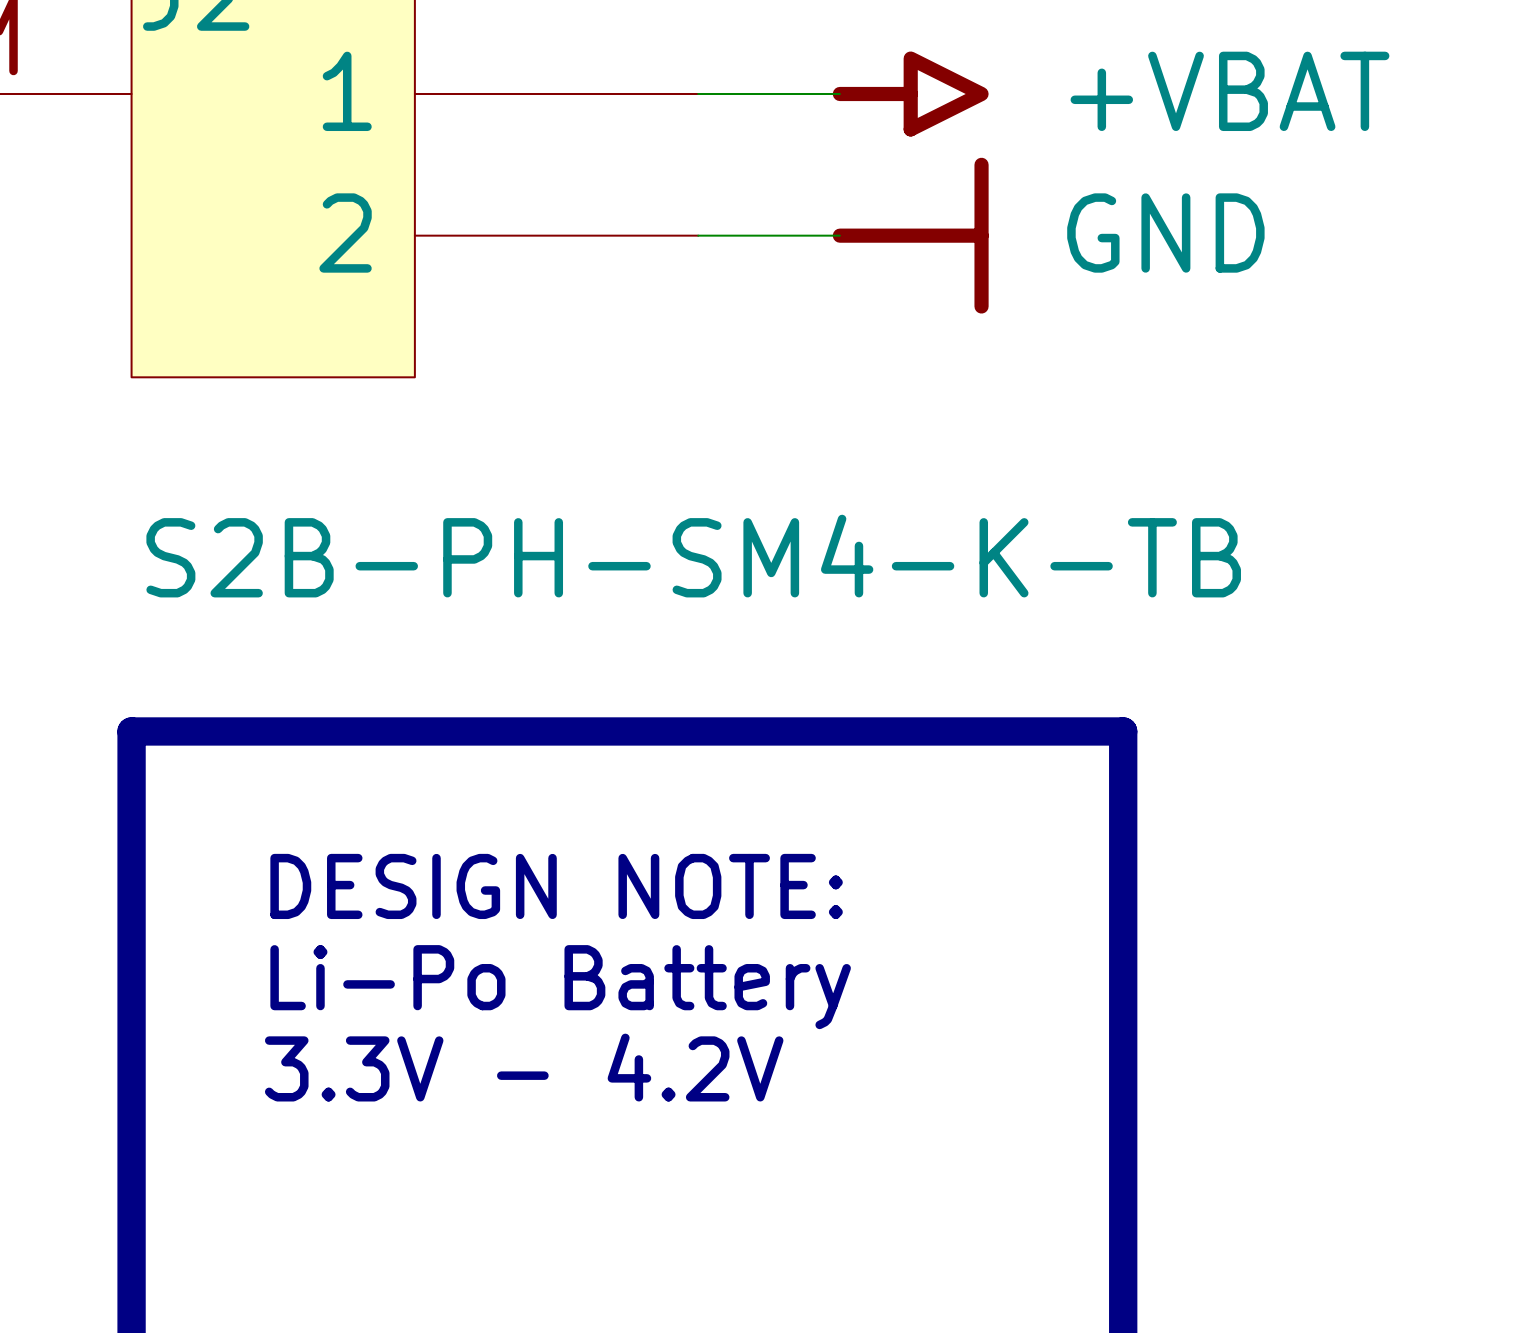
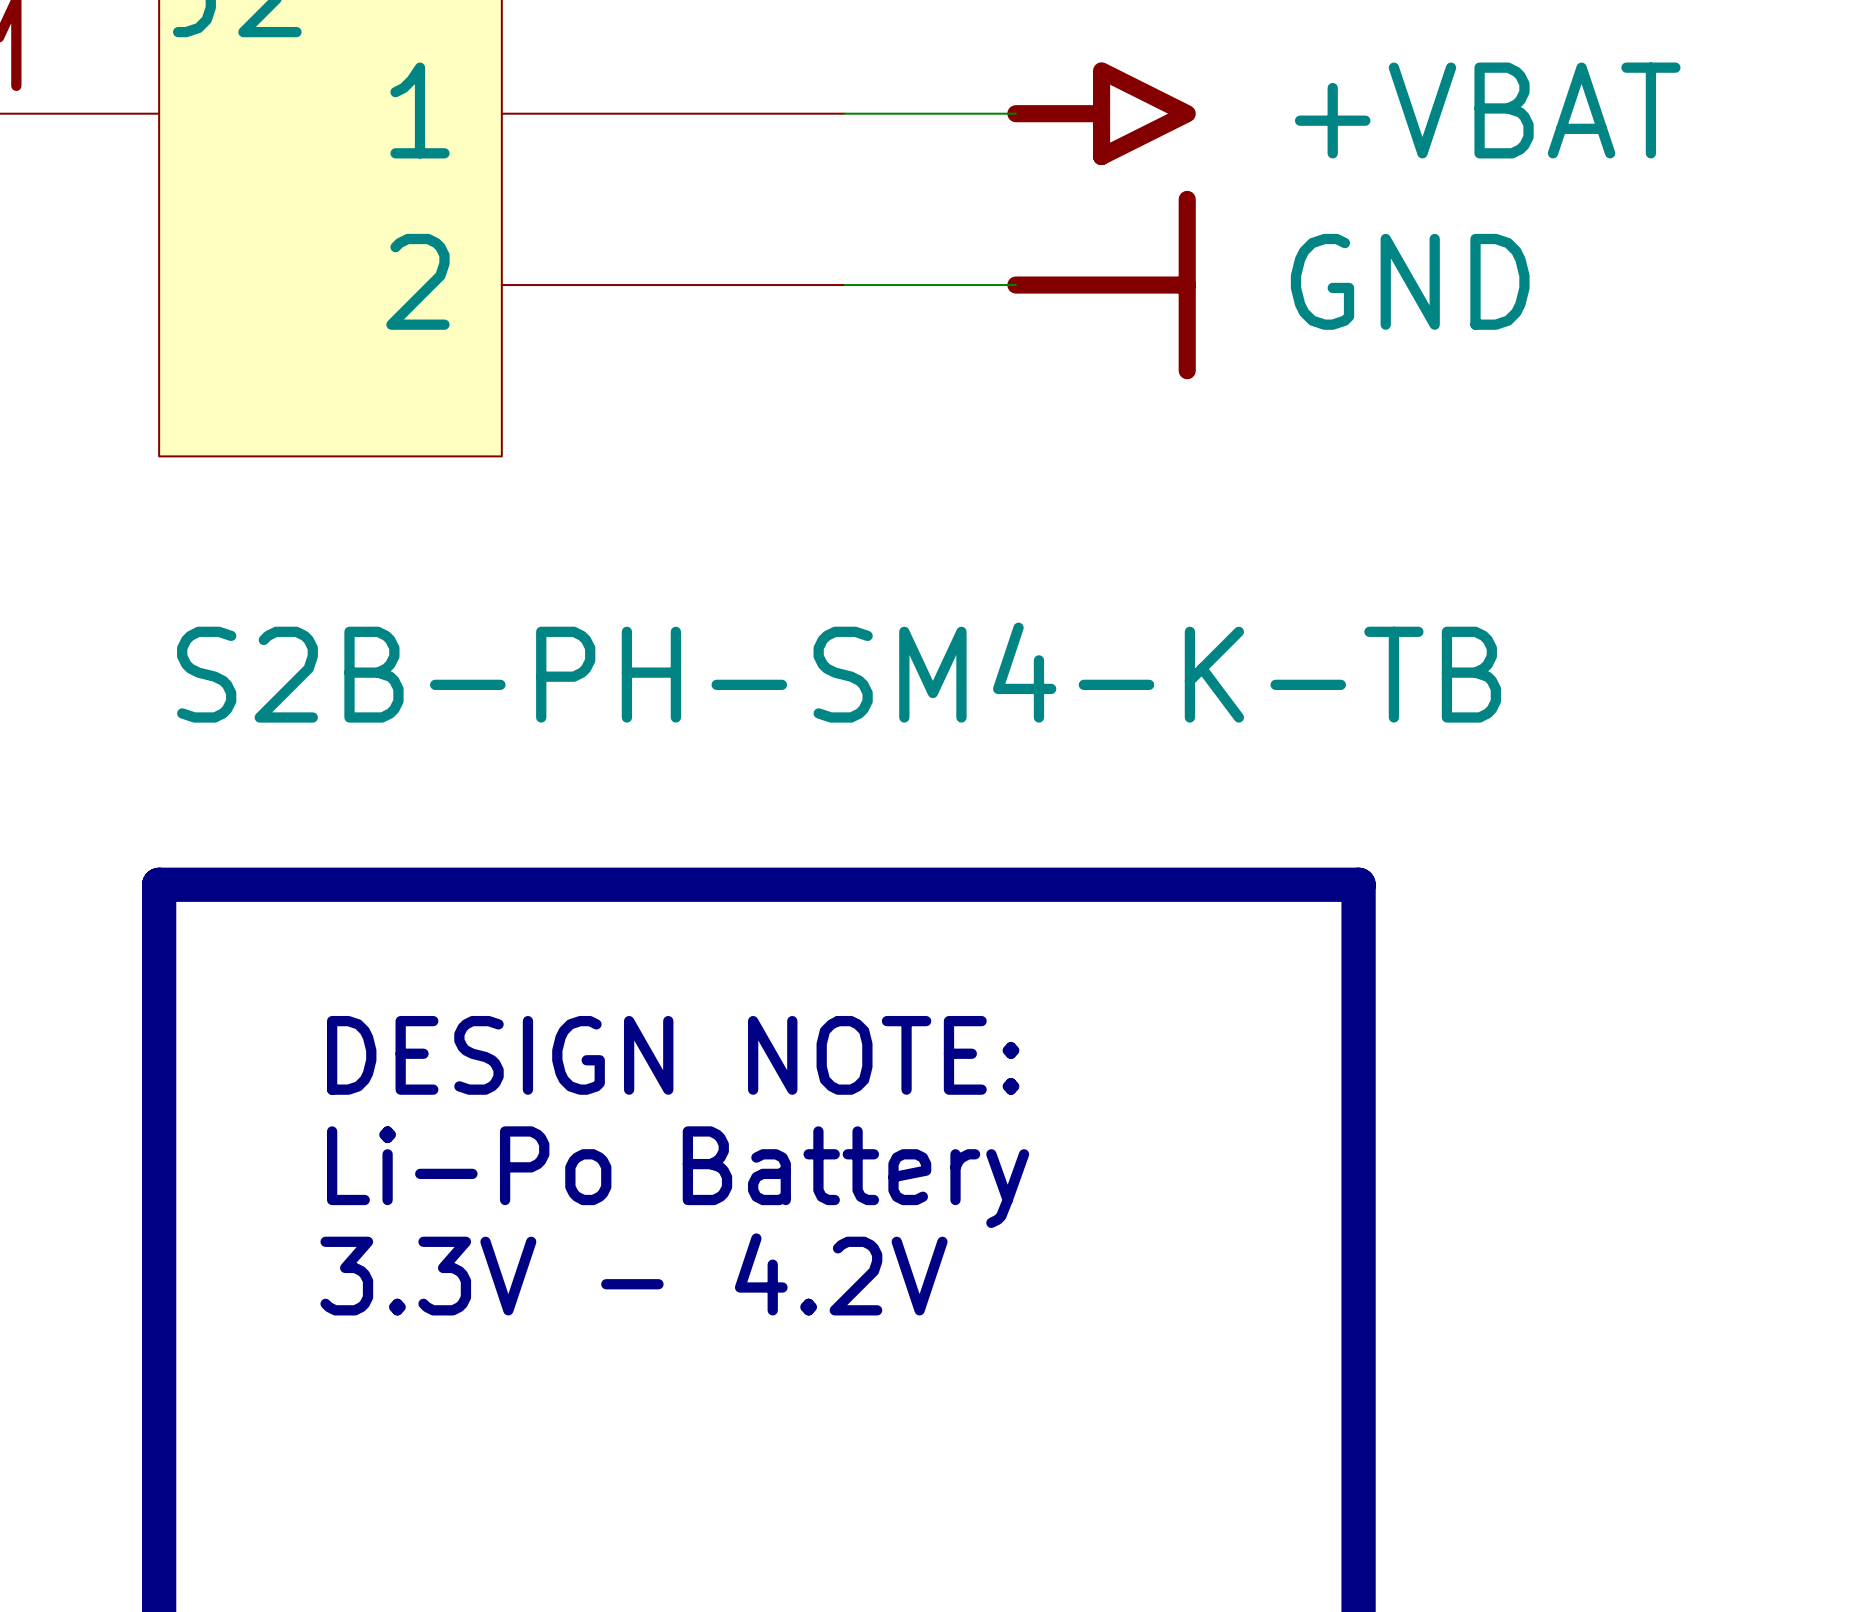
text position: DESIGN NOTE: (556, 886) -> DESIGN NOTE: (673, 1055)
text position: Li-Po Battery (560, 987) -> Li-Po Battery (678, 1177)
text position: 3.3V - 4.2V (524, 1067) -> 3.3V - 4.2V (634, 1274)

